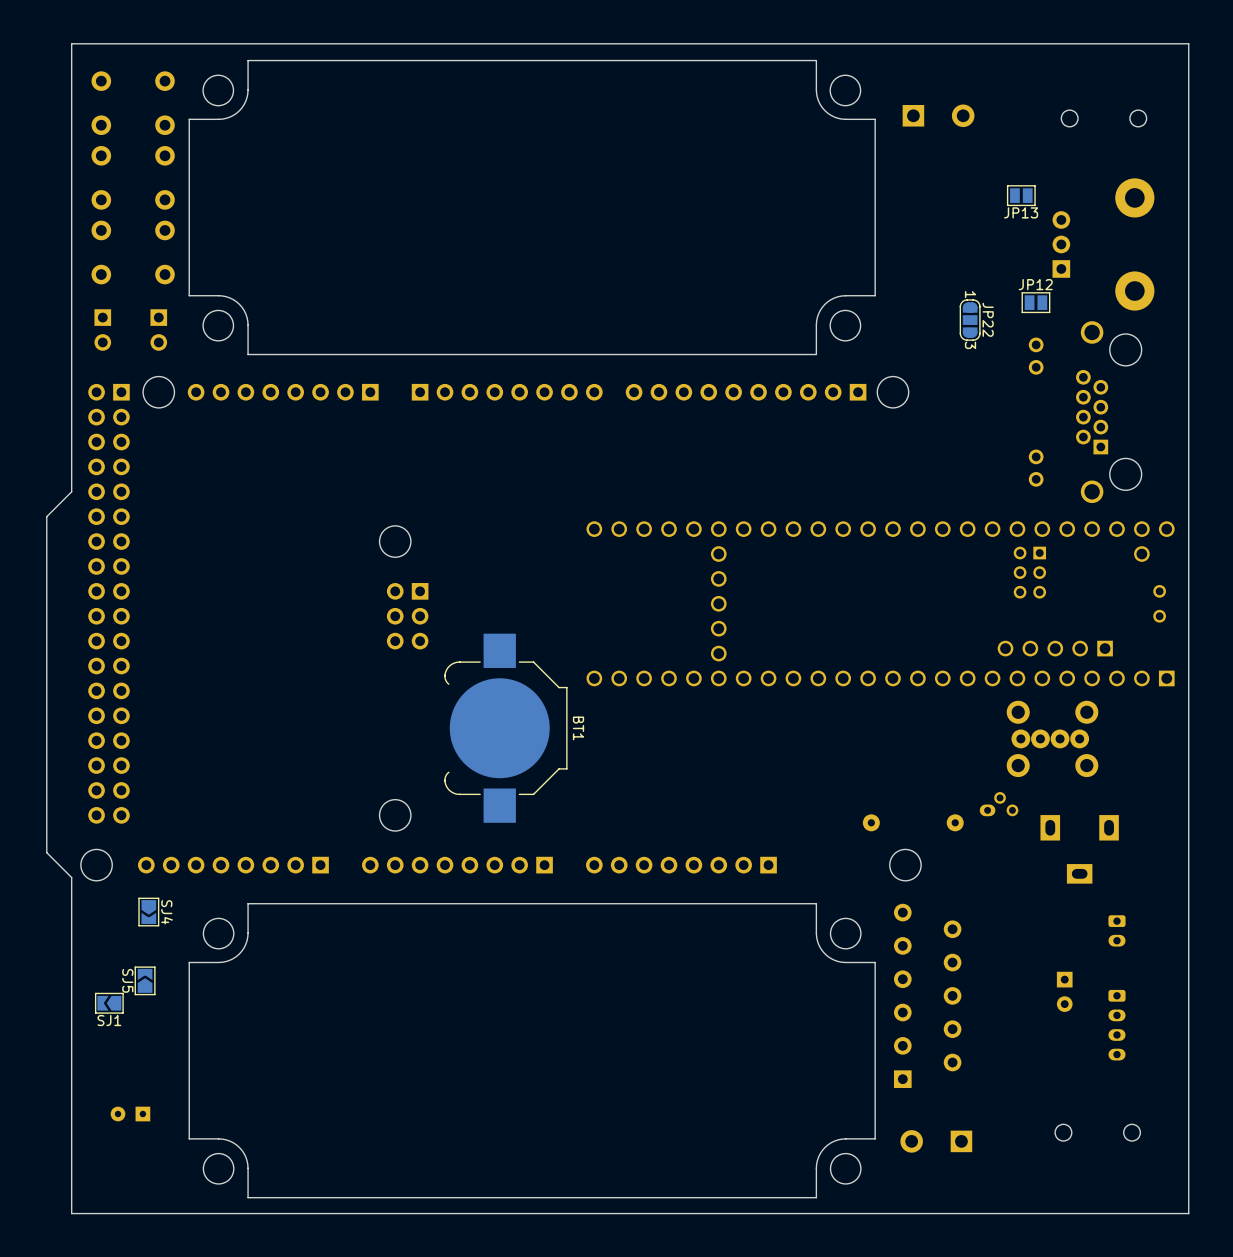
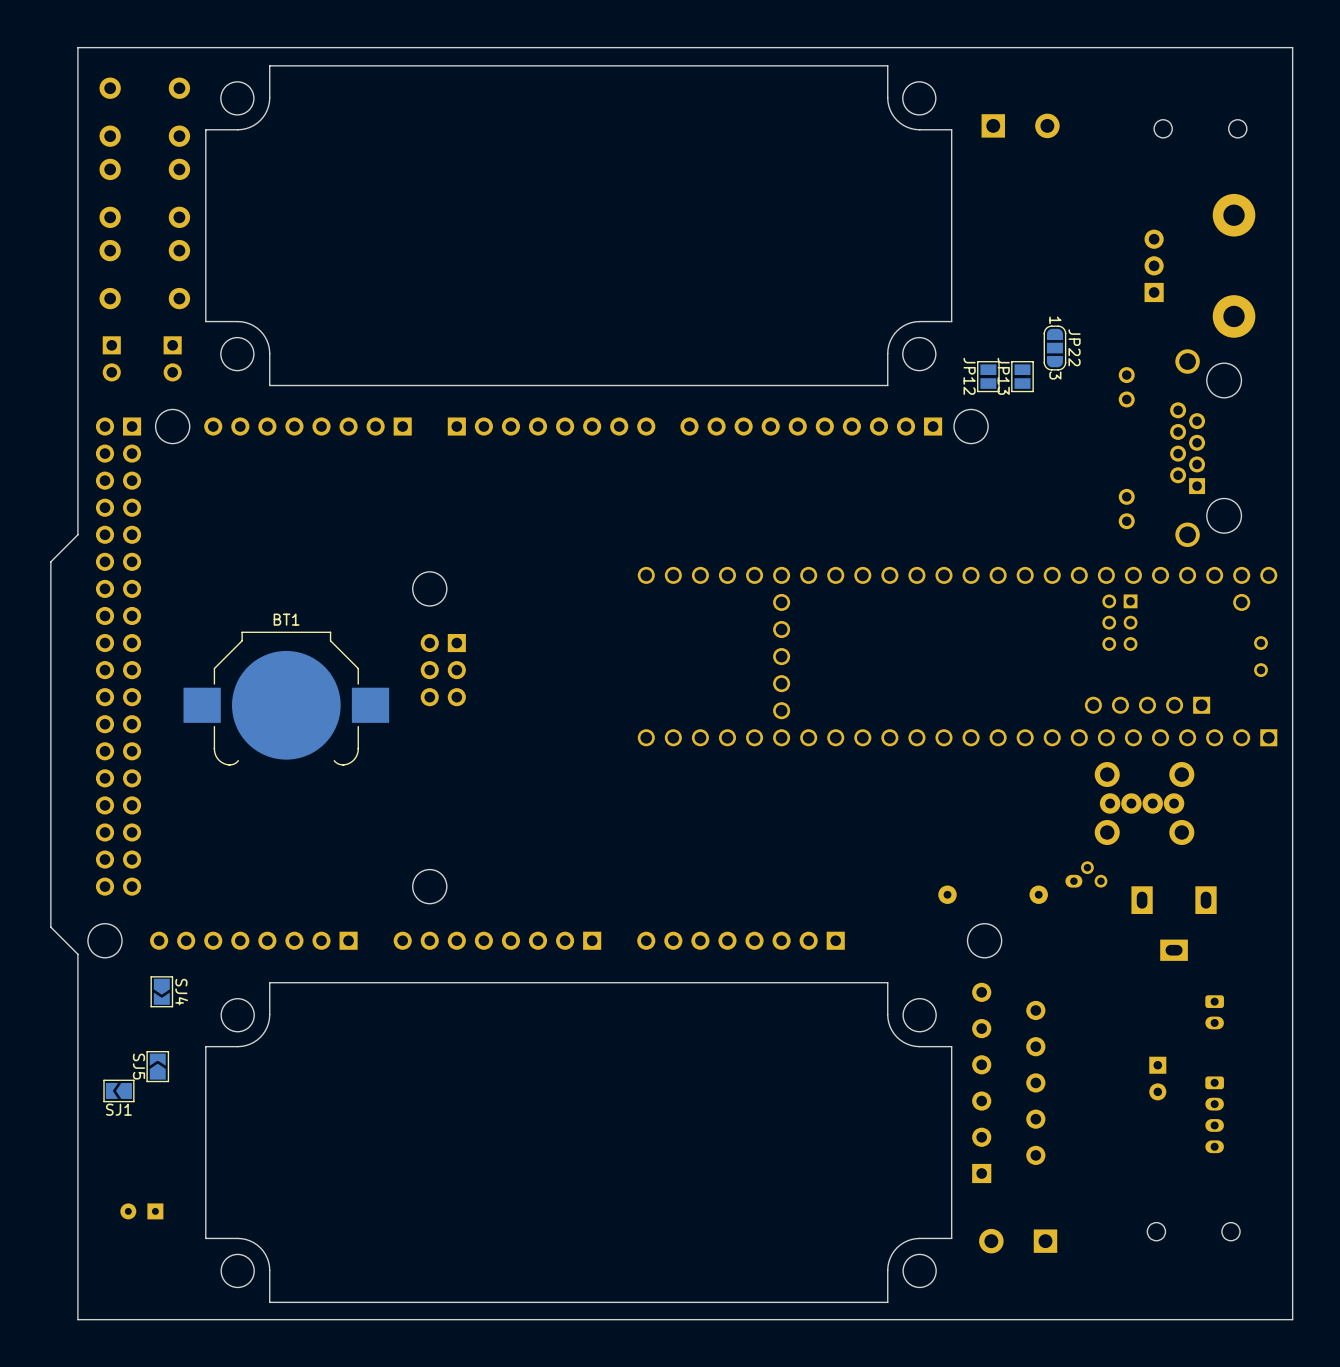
JP13 rotation: 0° (1021, 195) -> 90° clockwise (1022, 376)
JP13 position: (1021, 195) -> (1022, 376)
JP12 name position: JP12 (1035, 284) -> JP12 (969, 376)
JP12 rotation: 0° (1035, 302) -> 90° clockwise (988, 376)
JP12 position: (1035, 302) -> (988, 376)
BT1 rotation: 0° (505, 728) -> 90° counterclockwise (286, 698)
BT1 position: (505, 728) -> (286, 698)

